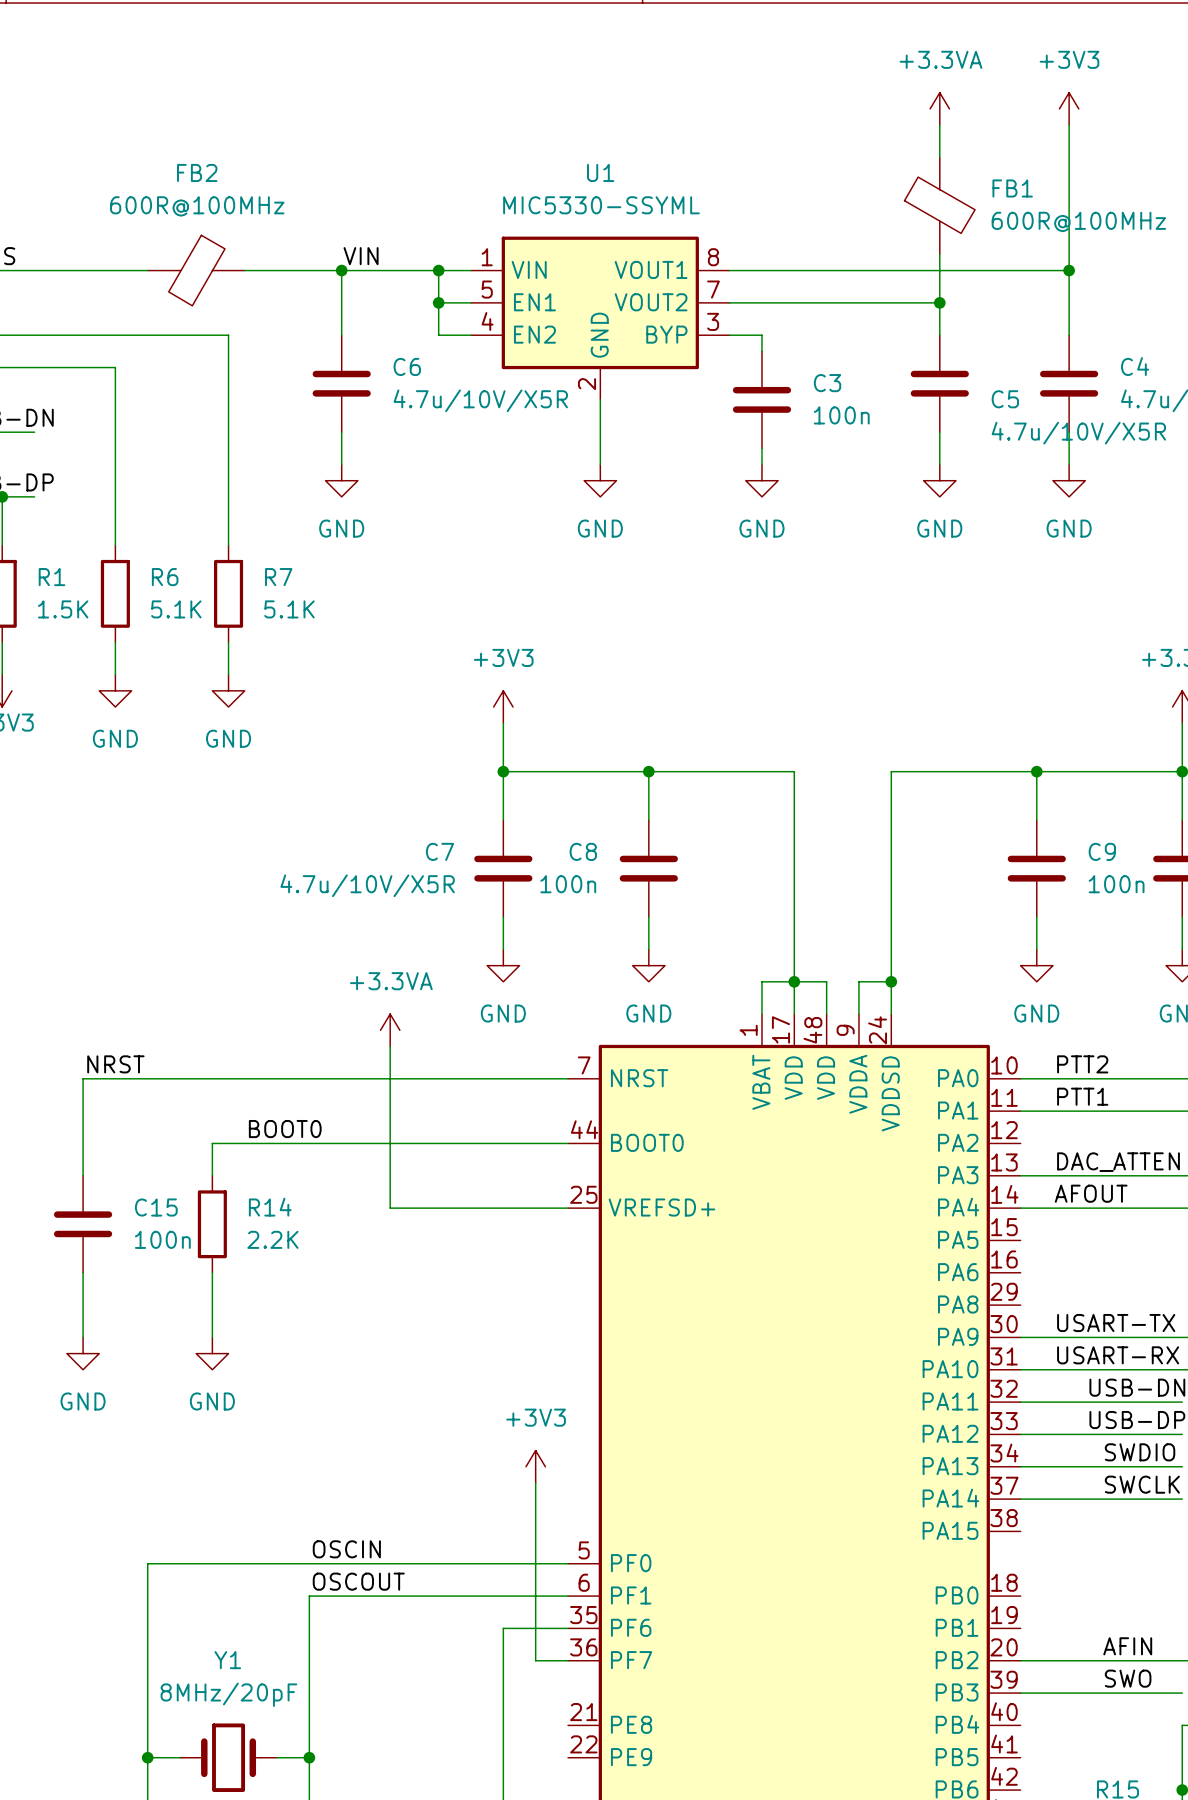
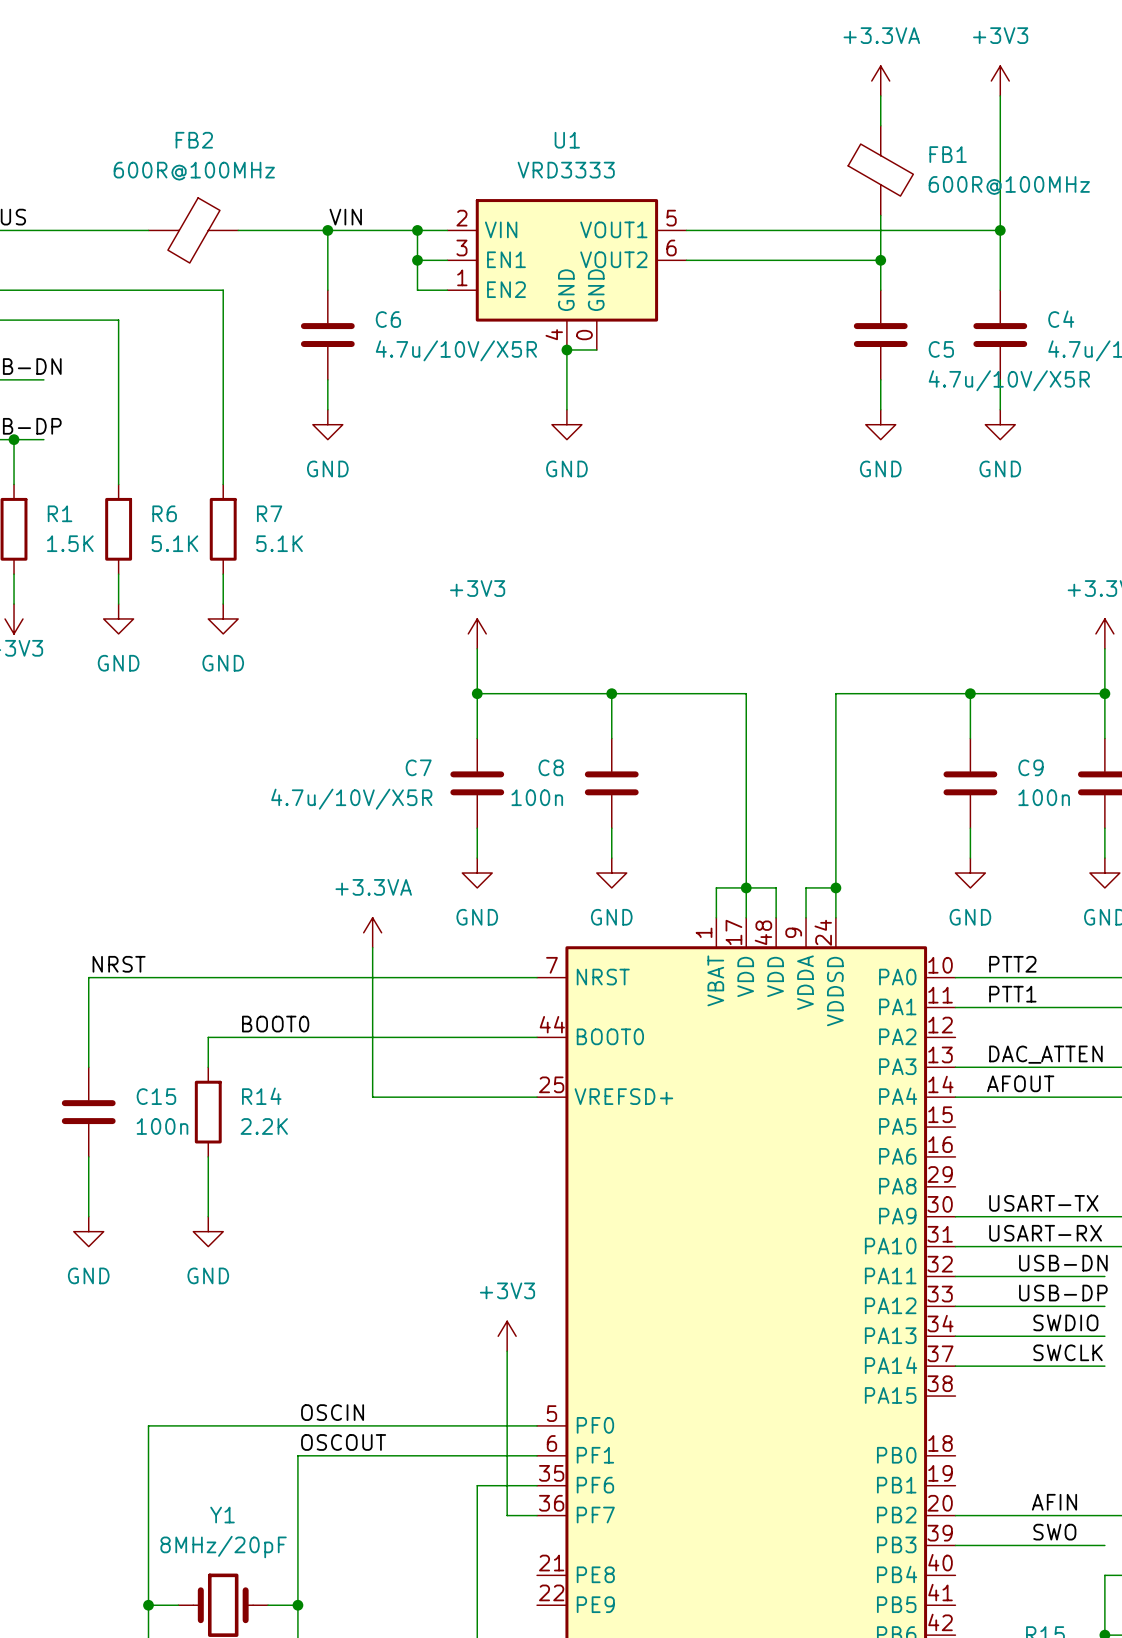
U1 value: MIC5330-SSYML (601, 205) -> VRD3333 (566, 170)
U1 symbol: [471, 236, 730, 400] -> [447, 199, 687, 350]
wire: (729, 335) (761, 335) (761, 351) -> none
wire: none -> (566, 349) (596, 349)
junction: none -> (566, 349)
C3: 100n (761, 399) -> none
wire: (761, 448) (761, 464) -> none
power symbol: GND (761, 480) -> none

